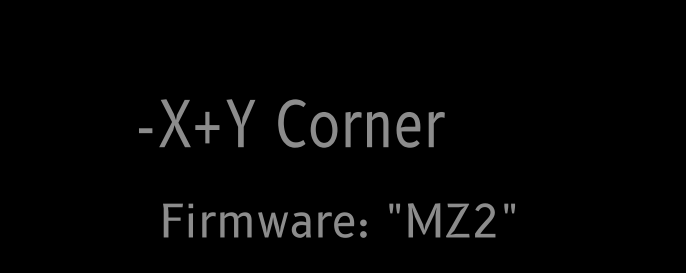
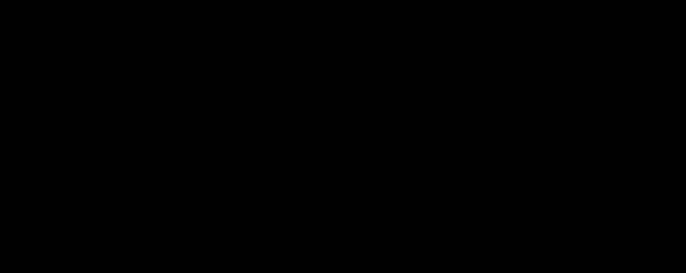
text: -X+Y Corner (291, 123) -> none
text: Firmware: "MZ2" (339, 220) -> none

